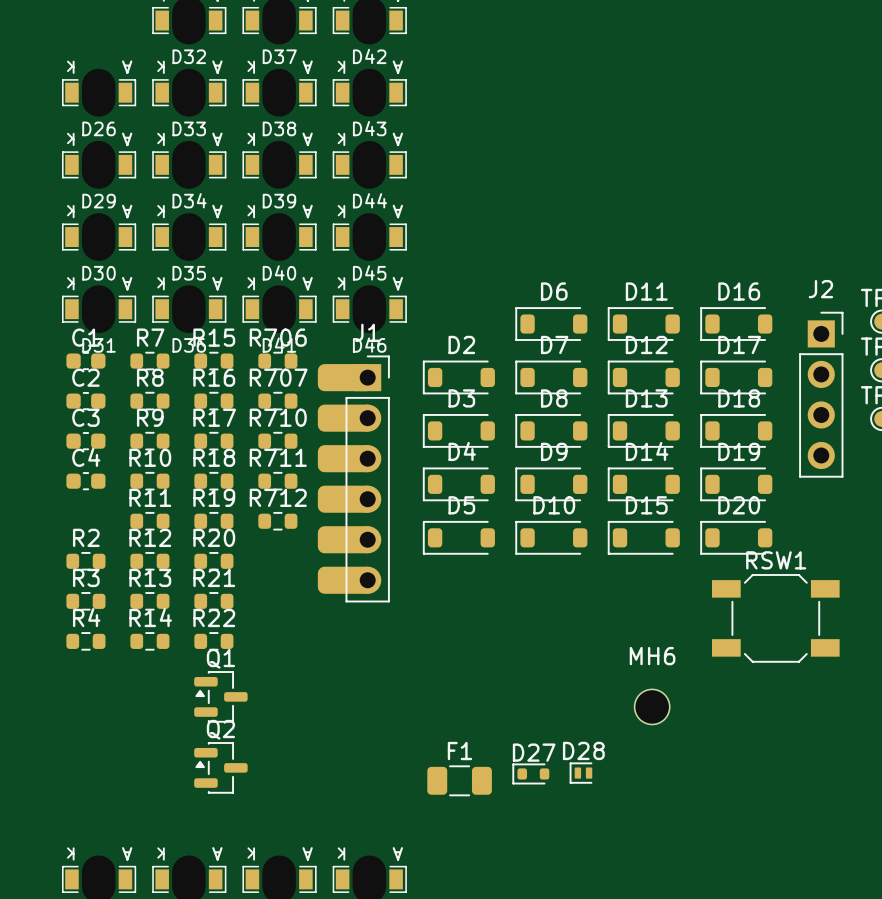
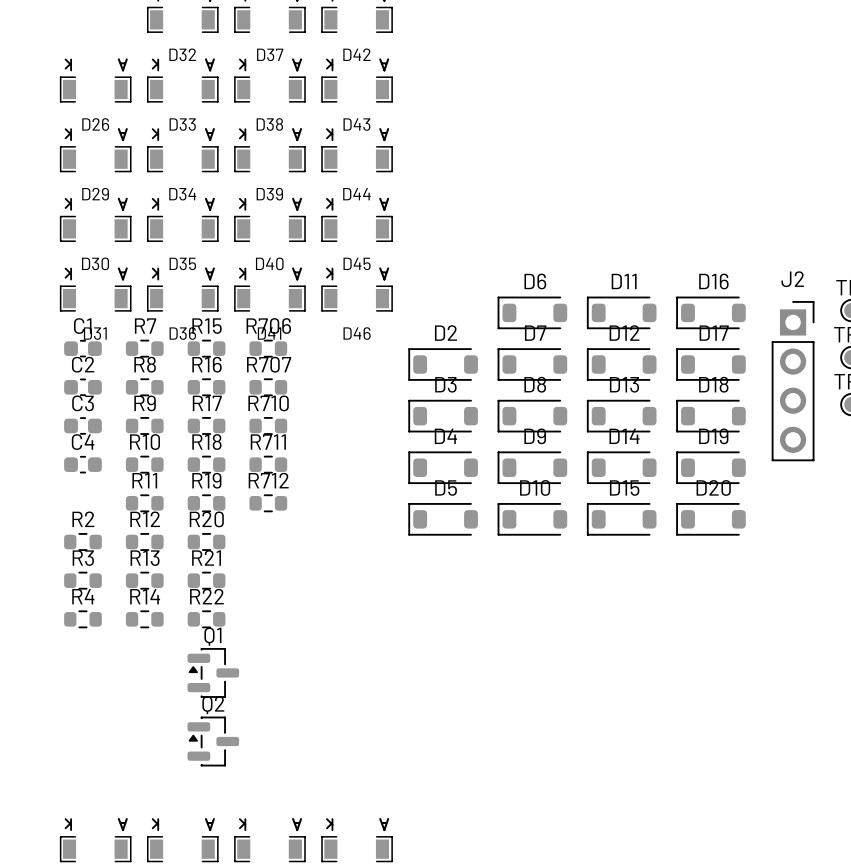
J1: (353, 478) -> none
RSW1: (775, 618) -> none
MH6: (652, 706) -> none
D27: (530, 773) -> none
D28: (581, 773) -> none
F1: (459, 780) -> none

